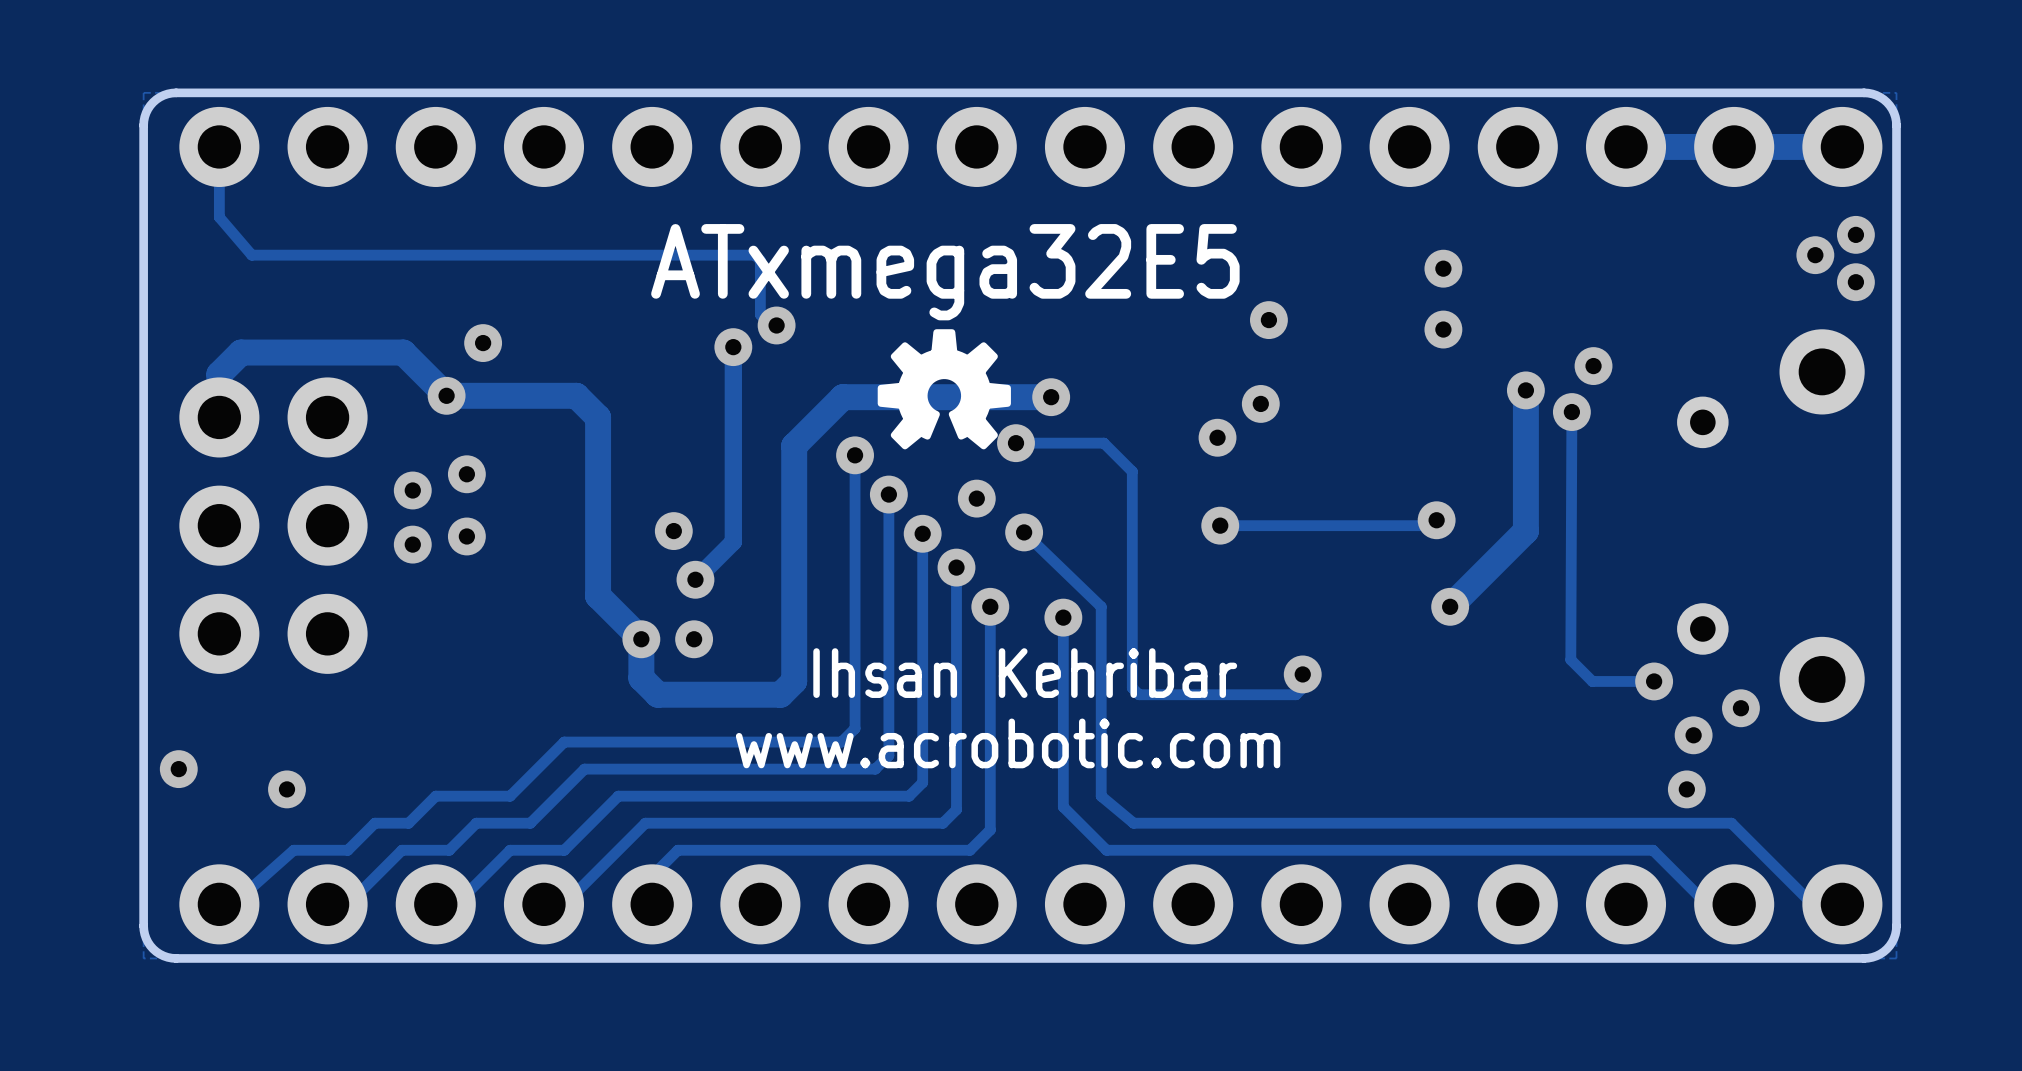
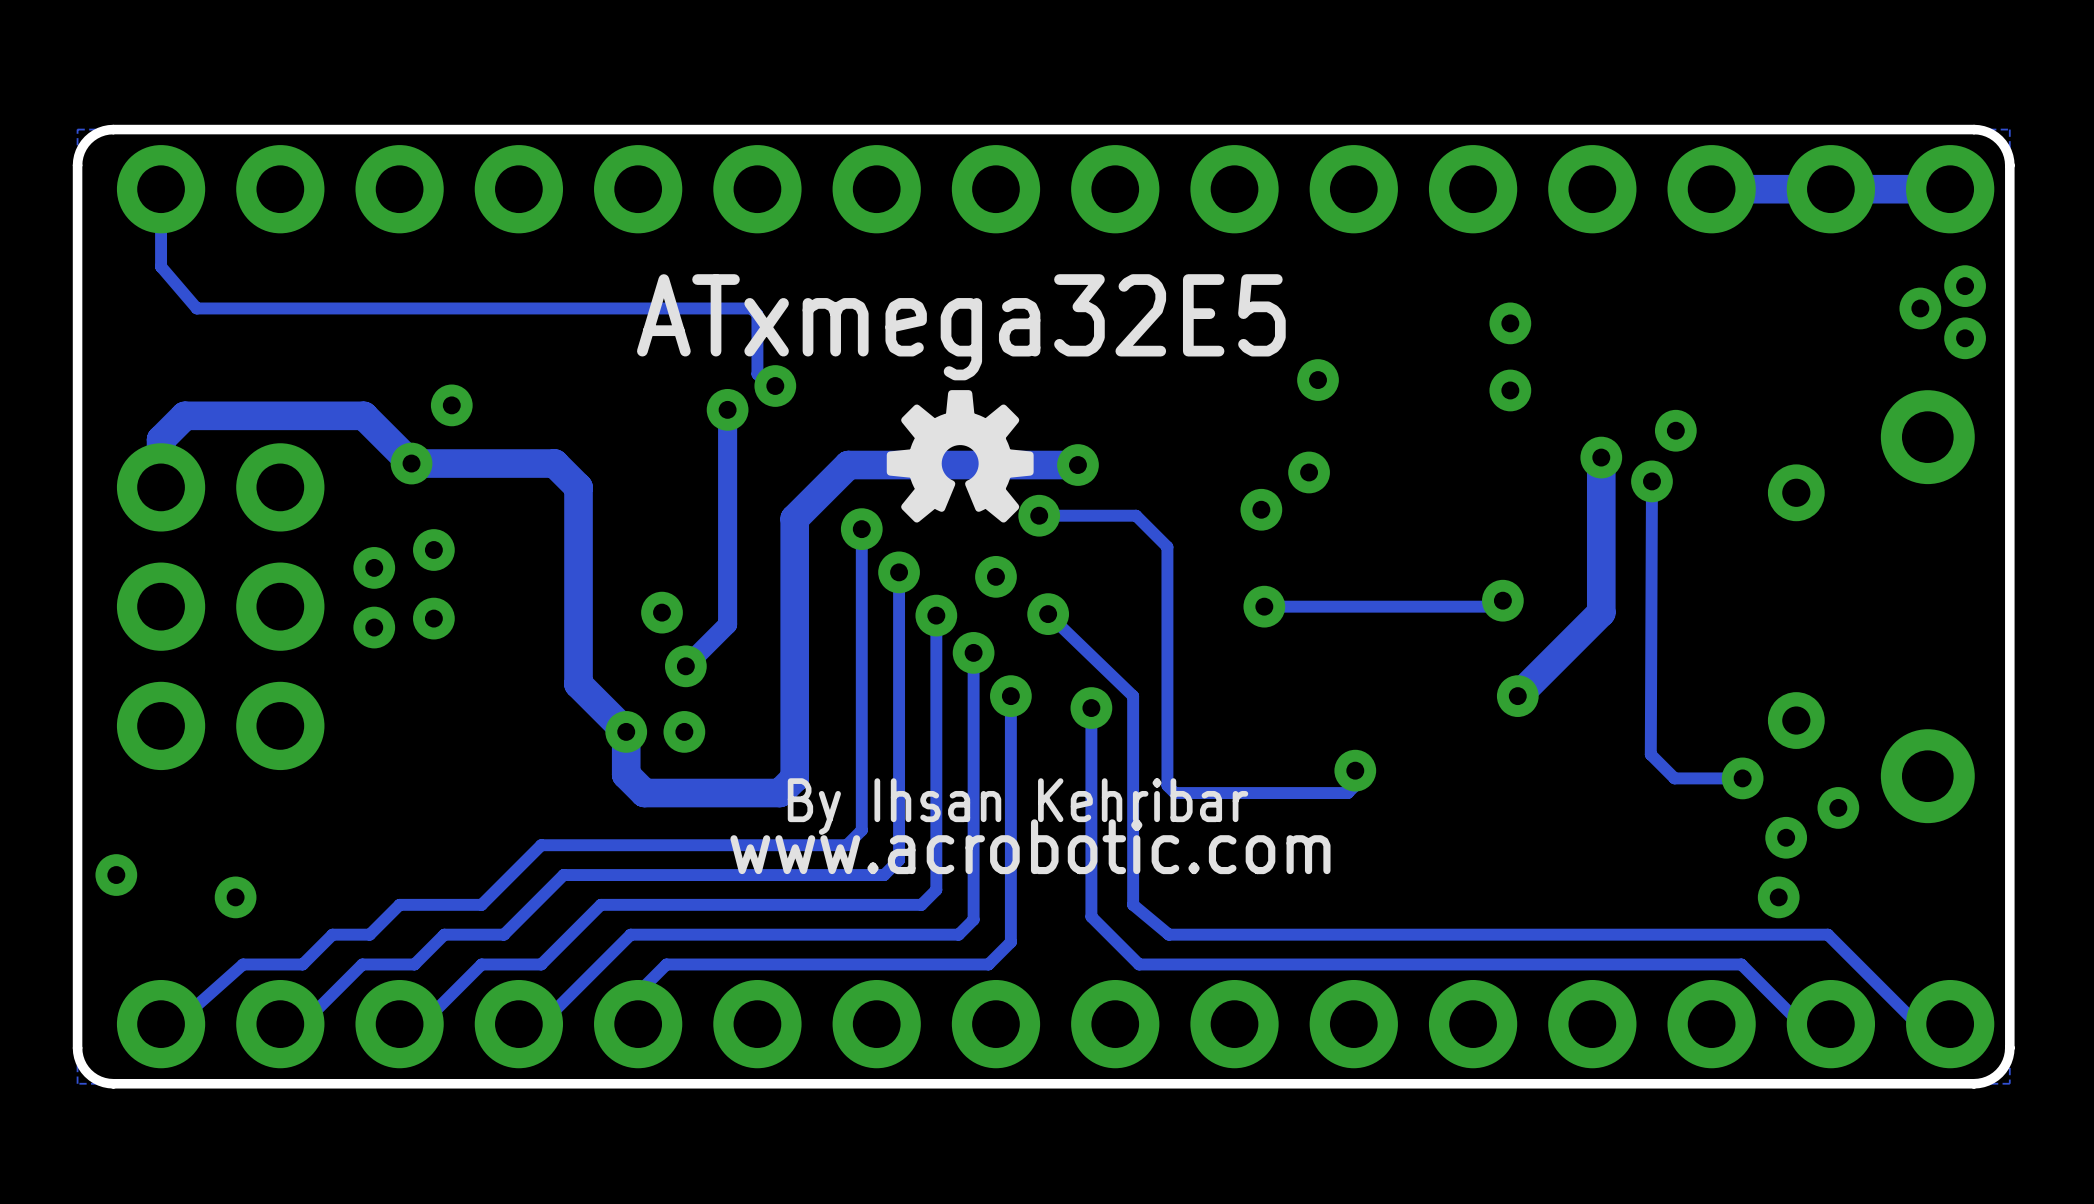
text: Ihsan Kehribar (1025, 673) -> By Ihsan Kehribar (1018, 806)

